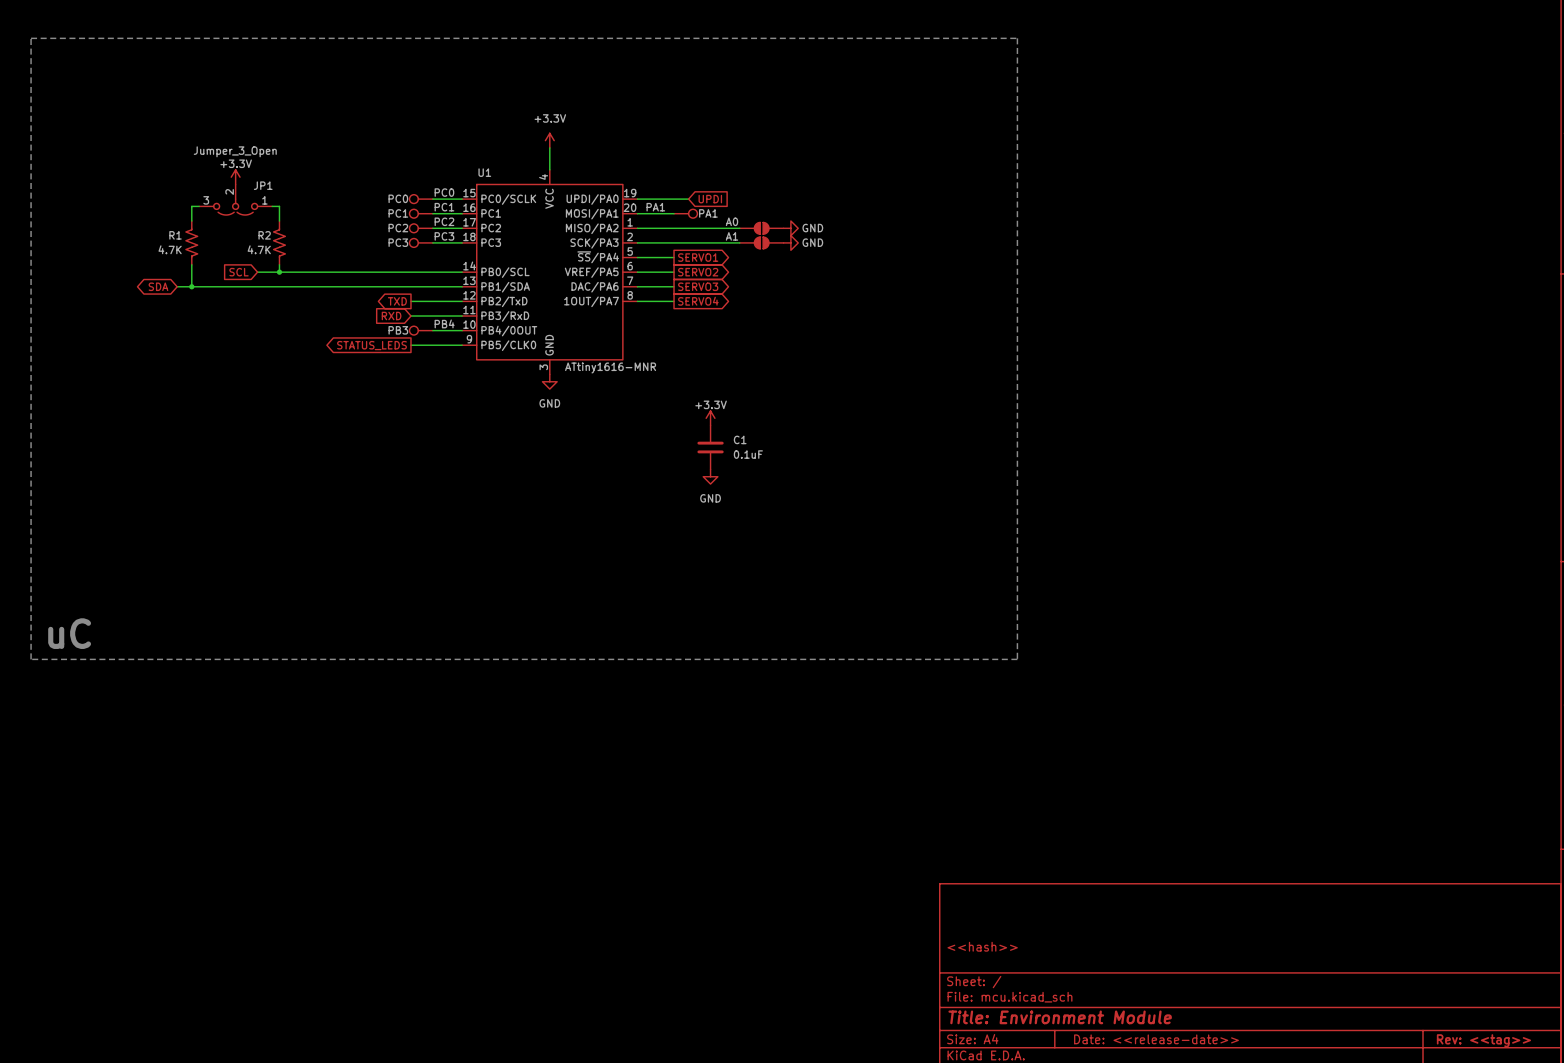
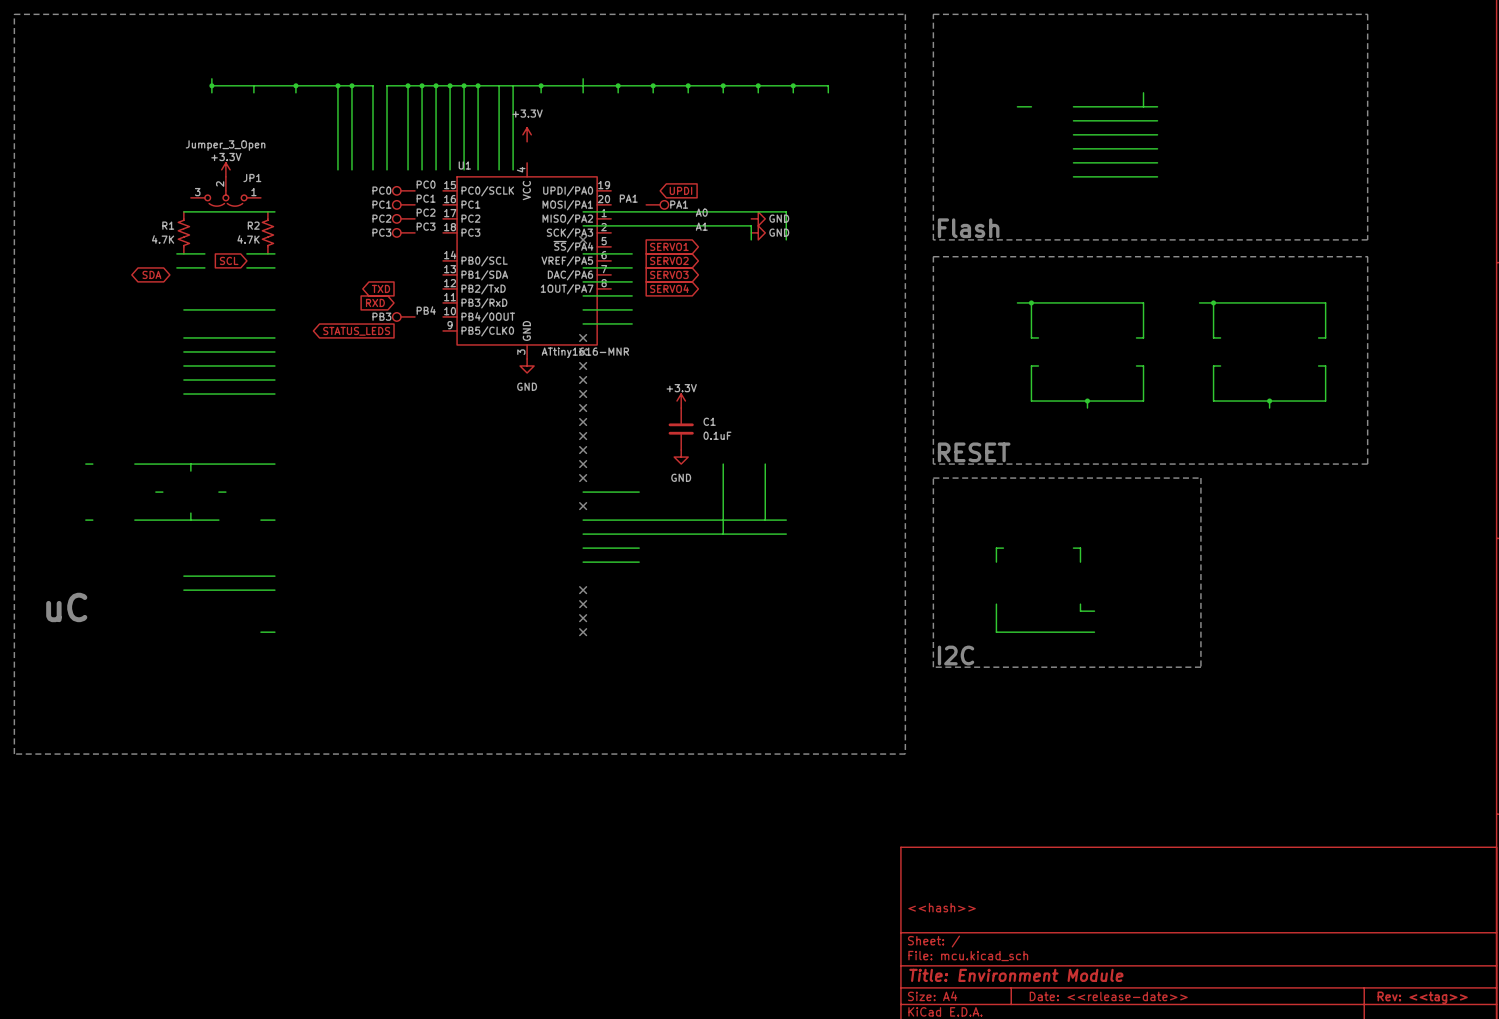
line: none -> (933, 14) (1367, 14) (1367, 239) (933, 239) (933, 14)
line: (31, 38) (1017, 38) (1017, 659) (31, 659) (31, 38) -> (14, 14) (14, 754) (905, 754) (905, 14) (14, 14)
wire: none -> (211, 78) (211, 92)
wire: none -> (583, 78) (583, 92)
wire: none -> (211, 85) (373, 85) (373, 169)
junction: none -> (211, 85)
wire: none -> (253, 85) (253, 92)
wire: none -> (295, 85) (295, 92)
junction: none -> (295, 85)
wire: none -> (337, 85) (337, 169)
junction: none -> (337, 85)
wire: none -> (351, 85) (351, 169)
junction: none -> (351, 85)
wire: none -> (408, 85) (408, 169)
junction: none -> (408, 85)
wire: none -> (422, 85) (422, 169)
junction: none -> (422, 85)
wire: none -> (436, 85) (436, 169)
junction: none -> (436, 85)
wire: none -> (450, 85) (450, 169)
junction: none -> (450, 85)
wire: none -> (464, 85) (464, 169)
junction: none -> (464, 85)
wire: none -> (478, 85) (478, 169)
junction: none -> (478, 85)
wire: none -> (499, 85) (499, 169)
wire: none -> (513, 85) (513, 169)
wire: none -> (541, 85) (541, 92)
junction: none -> (541, 85)
wire: none -> (618, 85) (618, 92)
junction: none -> (618, 85)
wire: none -> (653, 85) (653, 92)
junction: none -> (653, 85)
wire: none -> (688, 85) (688, 92)
junction: none -> (688, 85)
wire: none -> (723, 85) (723, 92)
junction: none -> (723, 85)
wire: none -> (758, 85) (758, 92)
junction: none -> (758, 85)
wire: none -> (793, 85) (793, 92)
junction: none -> (793, 85)
wire: none -> (828, 92) (828, 85) (387, 85) (387, 169)
wire: none -> (1143, 92) (1143, 106)
wire: none -> (1017, 106) (1031, 106)
wire: none -> (1073, 106) (1157, 106)
wire: none -> (1073, 120) (1157, 120)
wire: none -> (1073, 134) (1157, 134)
wire: (549, 147) (549, 169) -> none
wire: none -> (1073, 148) (1157, 148)
wire: none -> (1073, 162) (1157, 162)
wire: none -> (1073, 176) (1157, 176)
wire: (432, 199) (462, 199) -> none
wire: (637, 199) (688, 199) -> (583, 253) (632, 253)
wire: (199, 206) (191, 206) (191, 221) -> (274, 211) (183, 211)
wire: (272, 206) (279, 206) (279, 221) -> none
wire: (432, 213) (462, 213) -> none
wire: (637, 213) (674, 213) -> none
wire: none -> (583, 211) (786, 211) (786, 239)
wire: (432, 228) (462, 228) -> none
wire: (637, 228) (739, 228) -> none
part: (761, 228) -> none
wire: none -> (583, 225) (751, 225) (751, 239)
text: none -> Flash (968, 228)
wire: (432, 242) (462, 242) -> none
wire: (637, 242) (739, 242) -> none
part: (761, 242) -> none
no-connect mark: none -> (583, 239)
wire: (637, 257) (674, 257) -> none
wire: none -> (176, 253) (204, 253)
wire: (191, 264) (191, 286) -> none
wire: none -> (246, 253) (274, 253)
wire: (279, 264) (279, 272) -> none
line: none -> (933, 256) (933, 464) (1367, 464) (1367, 256) (933, 256)
wire: (257, 272) (462, 272) -> none
junction: (279, 272) -> none
wire: (637, 272) (674, 272) -> none
wire: none -> (176, 267) (204, 267)
wire: none -> (246, 267) (274, 267)
wire: none -> (583, 267) (632, 267)
wire: (177, 286) (462, 286) -> none
junction: (191, 286) -> none
wire: (637, 286) (674, 286) -> none
wire: none -> (583, 281) (632, 281)
wire: (410, 301) (462, 301) -> none
wire: (637, 301) (674, 301) -> none
wire: none -> (583, 295) (632, 295)
wire: (410, 316) (462, 316) -> none
wire: none -> (1017, 302) (1143, 302) (1143, 337) (1136, 337)
wire: none -> (1031, 302) (1031, 337) (1038, 337)
junction: none -> (1031, 302)
wire: none -> (1199, 302) (1325, 302) (1325, 337) (1318, 337)
wire: none -> (1213, 302) (1213, 337) (1220, 337)
junction: none -> (1213, 302)
wire: none -> (183, 309) (274, 309)
wire: none -> (583, 309) (632, 309)
wire: (432, 330) (462, 330) -> none
wire: none -> (583, 323) (632, 323)
wire: (410, 345) (462, 345) -> none
wire: none -> (183, 337) (274, 337)
no-connect mark: none -> (583, 337)
wire: none -> (183, 351) (274, 351)
no-connect mark: none -> (583, 351)
wire: none -> (183, 365) (274, 365)
no-connect mark: none -> (583, 365)
wire: none -> (1038, 365) (1031, 365) (1031, 401) (1143, 401) (1143, 365) (1136, 365)
wire: none -> (1220, 365) (1213, 365) (1213, 401) (1325, 401) (1325, 365) (1318, 365)
wire: none -> (183, 380) (274, 380)
no-connect mark: none -> (583, 380)
wire: none -> (183, 394) (274, 394)
no-connect mark: none -> (583, 394)
wire: none -> (1087, 401) (1087, 408)
junction: none -> (1087, 401)
wire: none -> (1269, 401) (1269, 408)
junction: none -> (1269, 401)
no-connect mark: none -> (583, 408)
no-connect mark: none -> (583, 422)
no-connect mark: none -> (583, 436)
no-connect mark: none -> (583, 450)
text: none -> RESET (974, 452)
wire: none -> (85, 464) (92, 464)
wire: none -> (134, 464) (274, 464)
wire: none -> (190, 464) (190, 471)
no-connect mark: none -> (583, 464)
wire: none -> (723, 464) (723, 534)
wire: none -> (765, 464) (765, 520)
no-connect mark: none -> (583, 478)
line: none -> (933, 478) (933, 667) (1200, 667) (1200, 478) (933, 478)
wire: none -> (155, 492) (162, 492)
wire: none -> (218, 492) (225, 492)
wire: none -> (583, 492) (639, 492)
no-connect mark: none -> (583, 506)
wire: none -> (190, 513) (190, 520)
wire: none -> (85, 520) (92, 520)
wire: none -> (134, 520) (218, 520)
wire: none -> (260, 520) (274, 520)
wire: none -> (583, 520) (786, 520)
wire: none -> (583, 534) (786, 534)
wire: none -> (583, 548) (639, 548)
wire: none -> (1003, 548) (996, 548) (996, 562)
wire: none -> (1073, 548) (1080, 548) (1080, 562)
wire: none -> (583, 562) (639, 562)
wire: none -> (183, 576) (274, 576)
wire: none -> (183, 590) (274, 590)
no-connect mark: none -> (583, 590)
no-connect mark: none -> (583, 604)
wire: none -> (996, 604) (996, 632) (1094, 632)
wire: none -> (1080, 604) (1080, 611) (1094, 611)
no-connect mark: none -> (583, 618)
no-connect mark: none -> (583, 632)
text: none -> I2C (956, 655)

